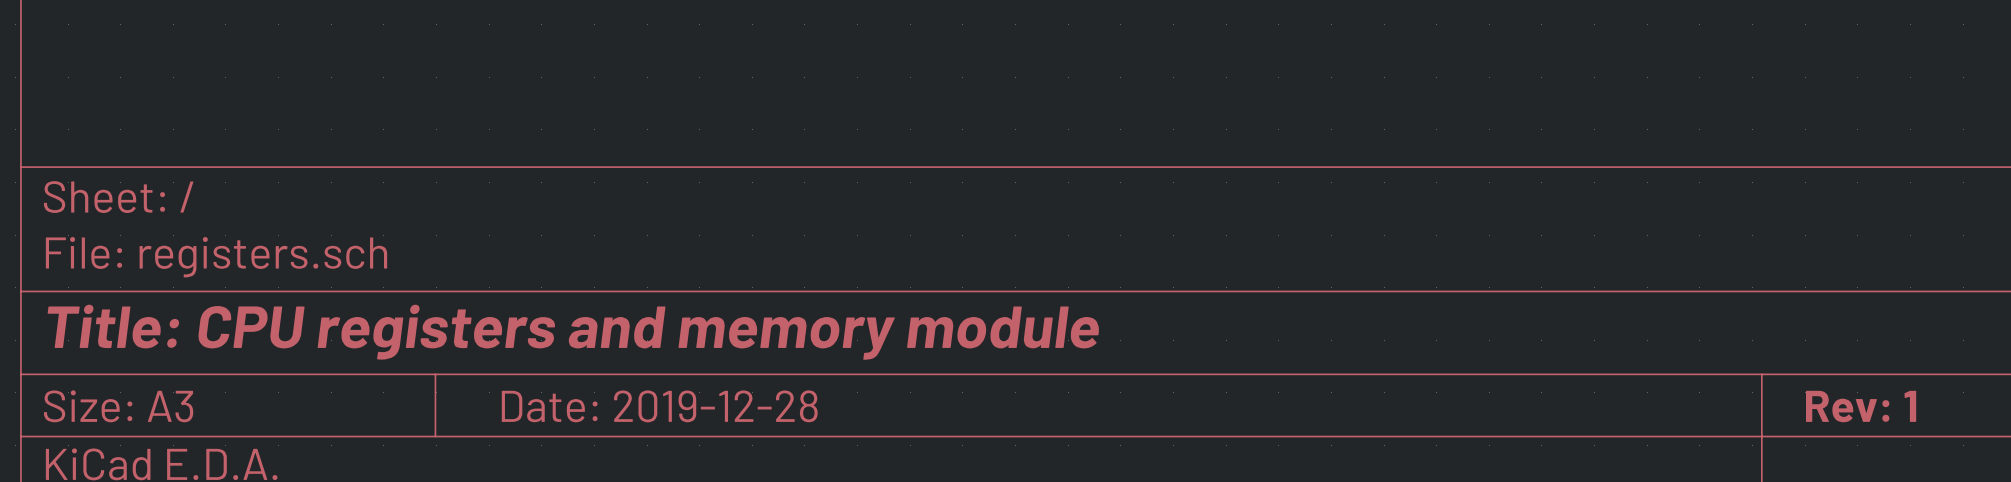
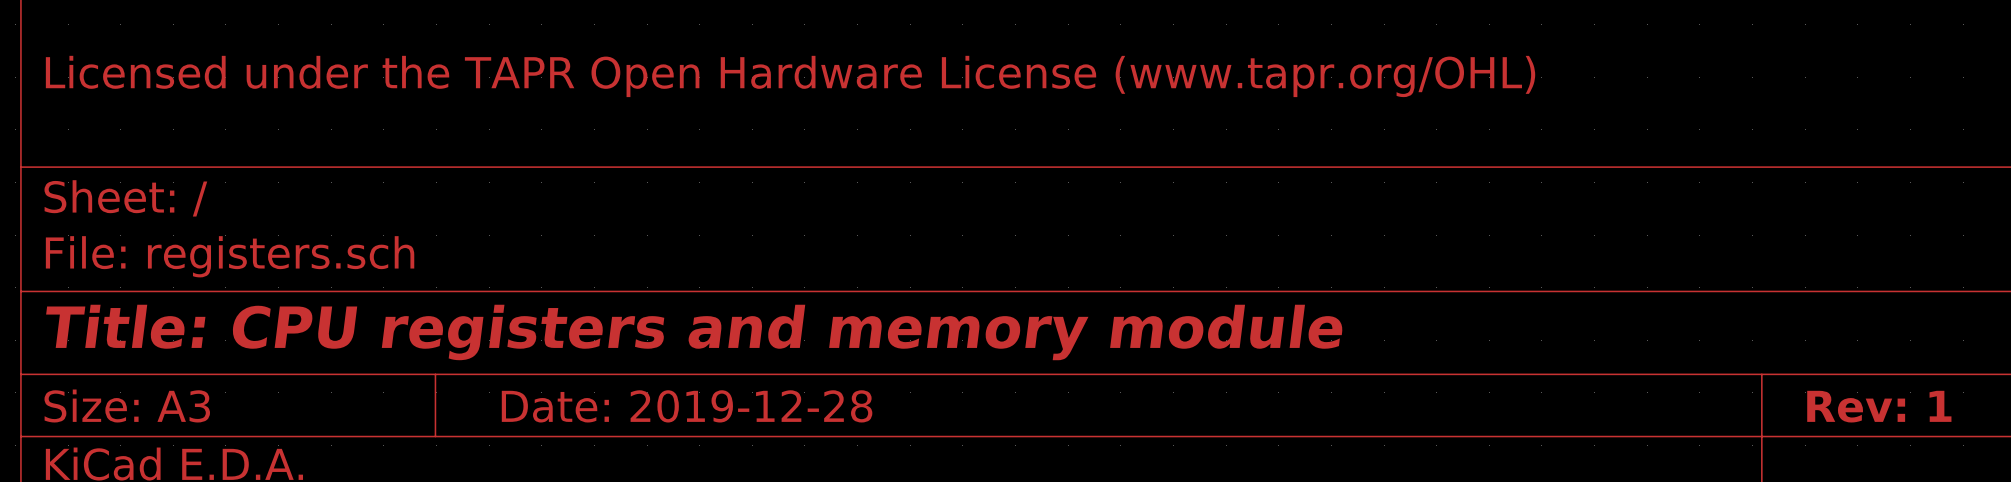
title block: none -> Licensed under the TAPR Open Hardware License (www.tapr.org/OHL) (790, 76)

